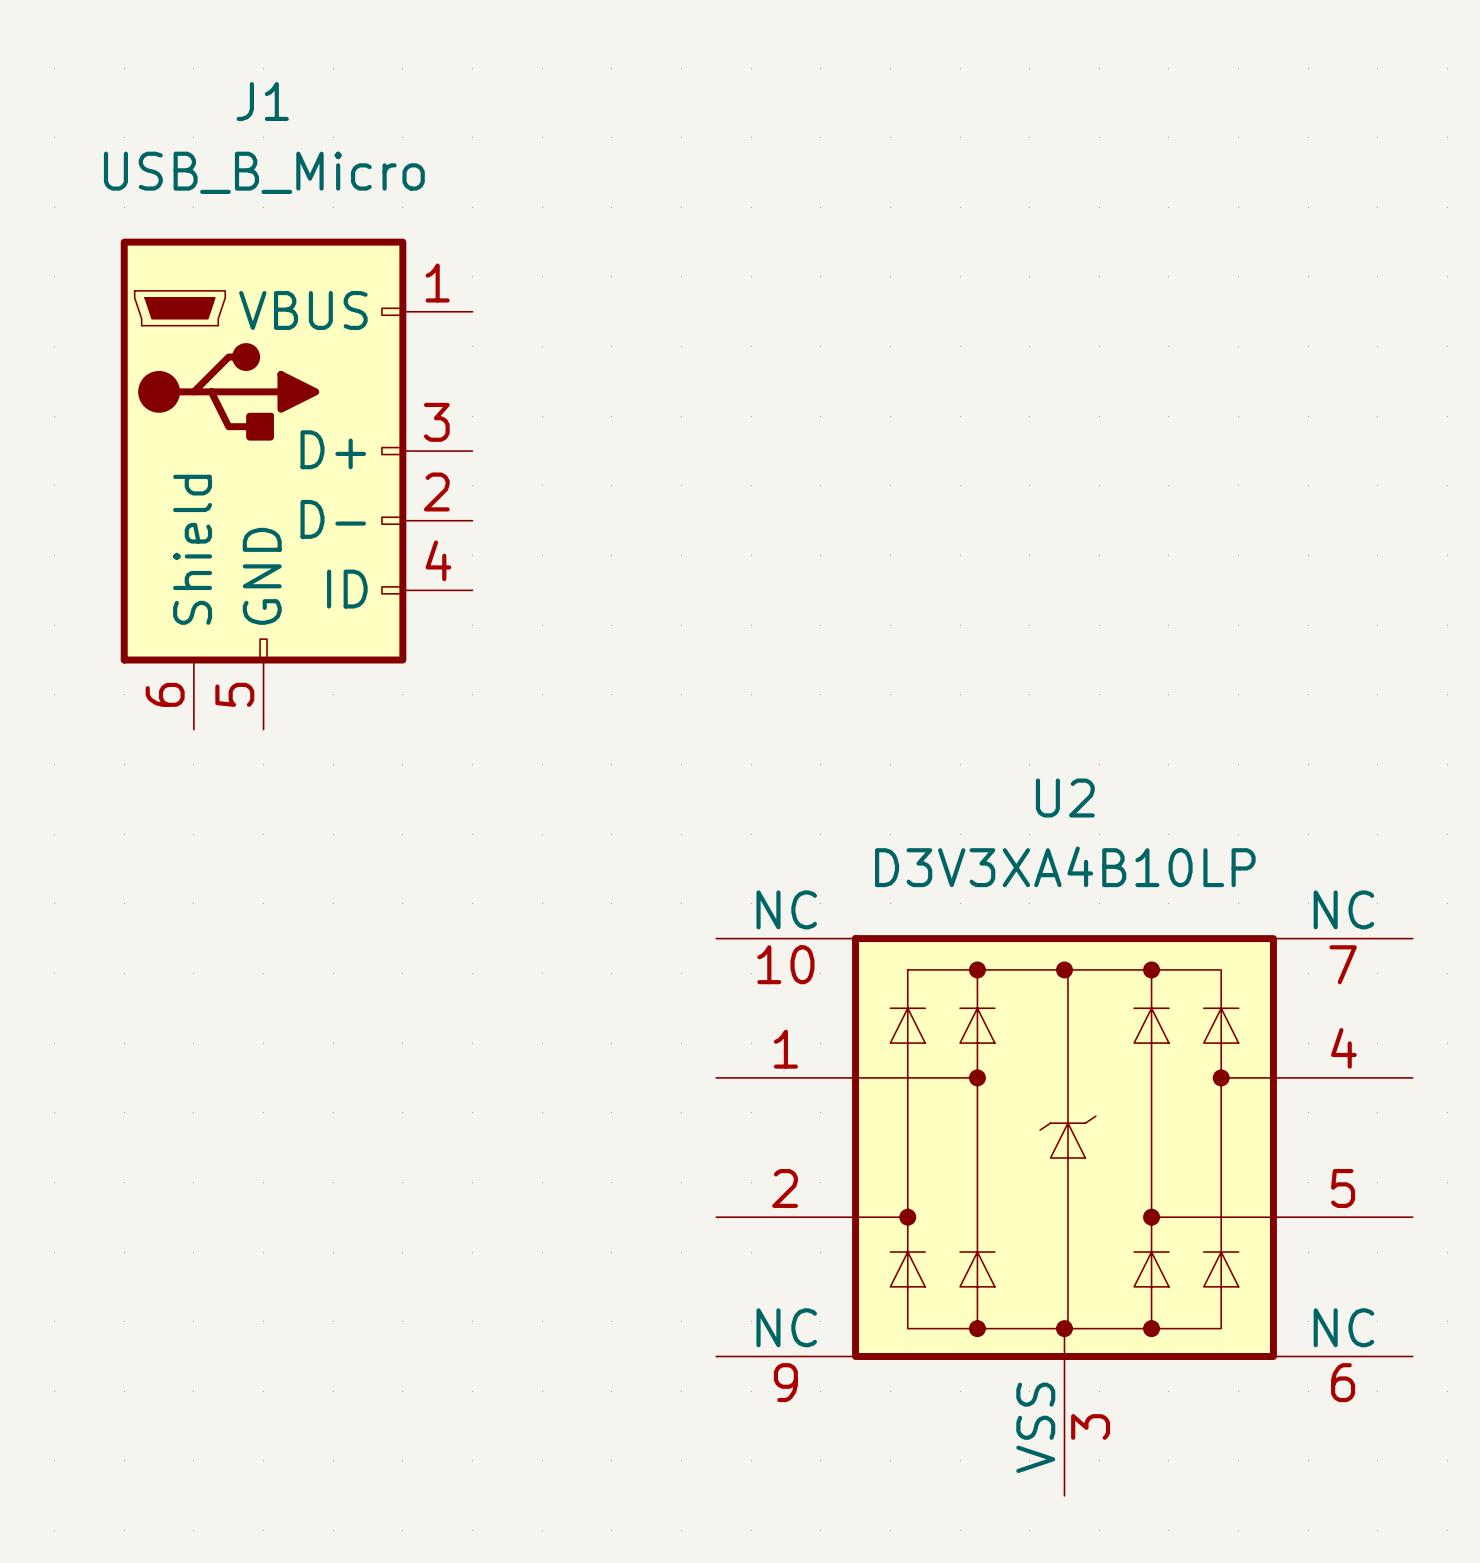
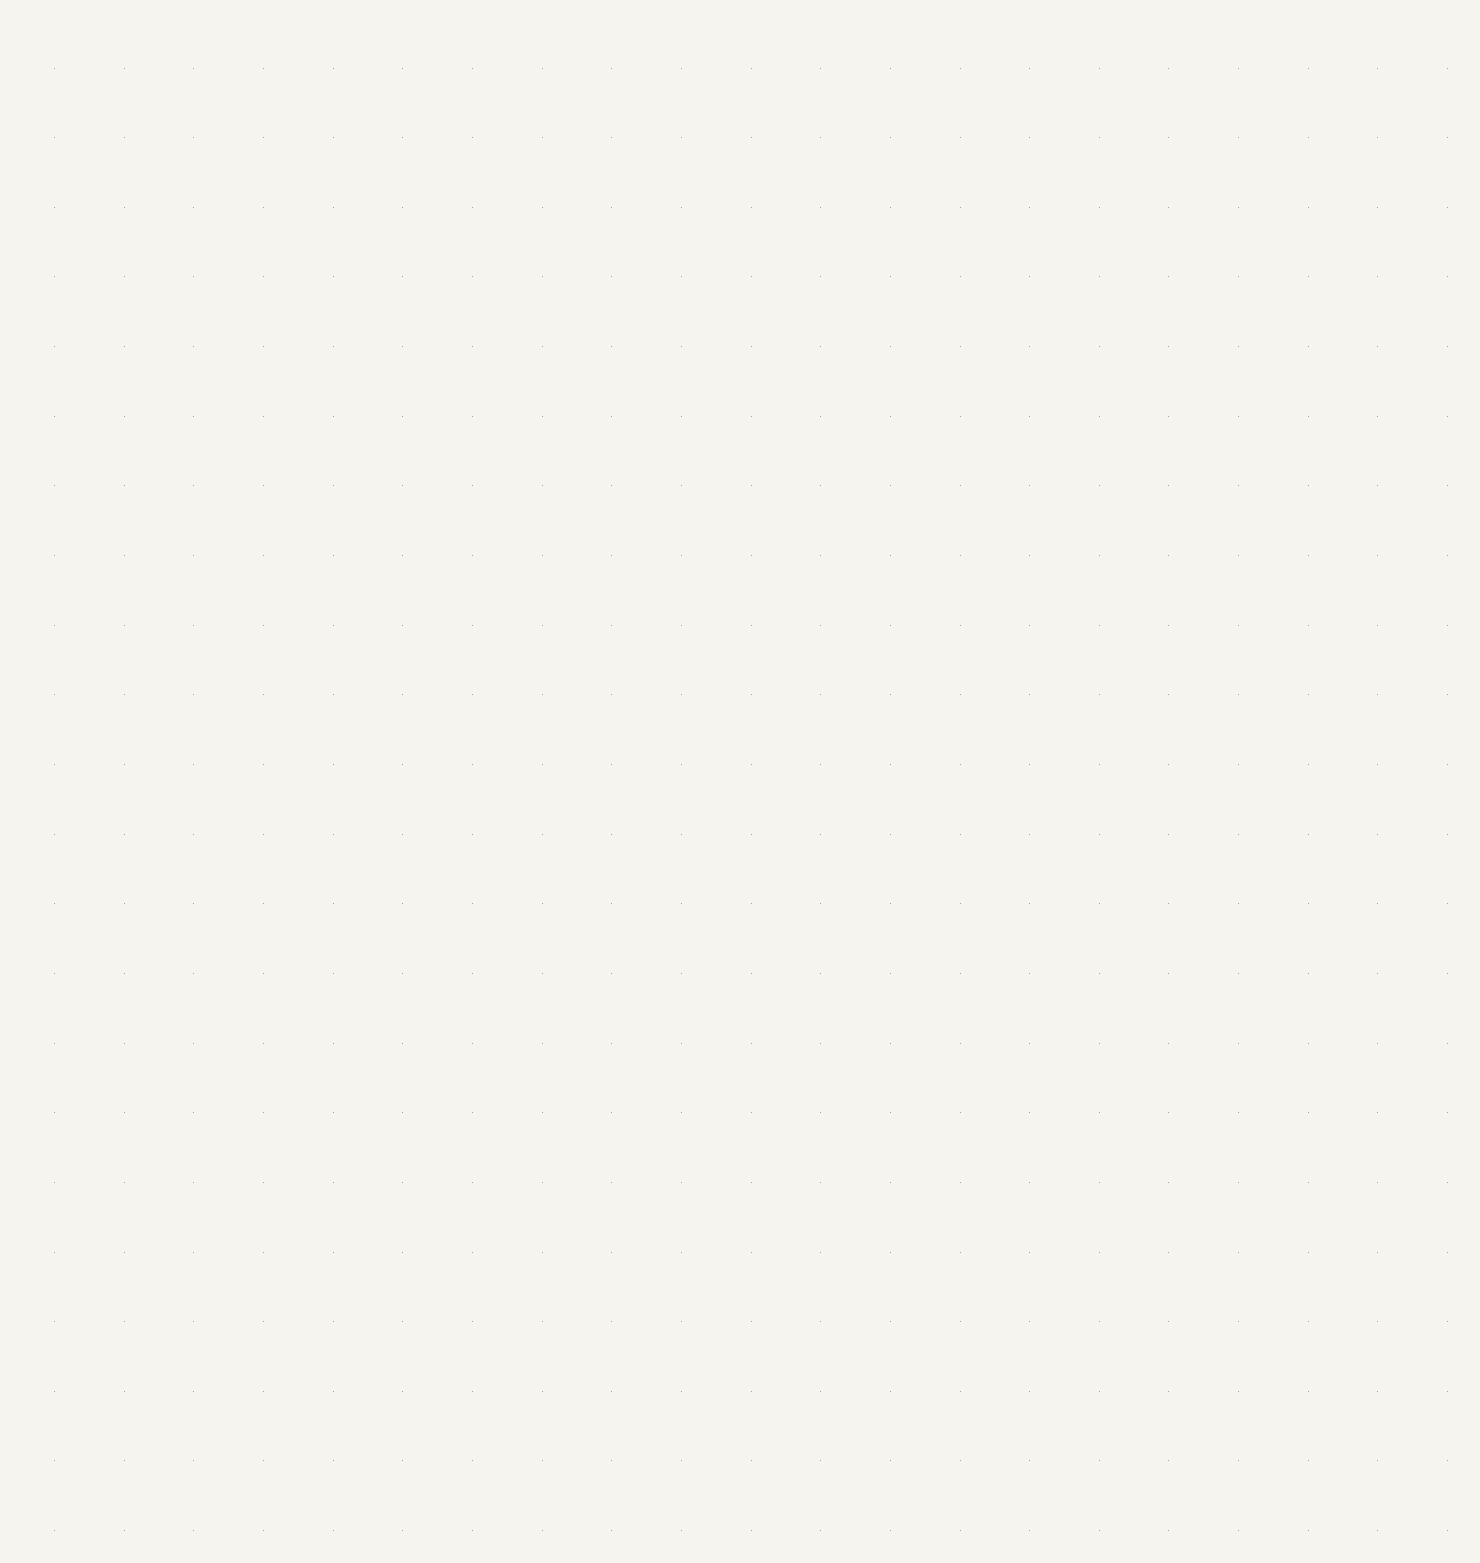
J1: USB_B_Micro (296, 484) -> none
U2: D3V3XA4B10LP (1064, 1215) -> none

